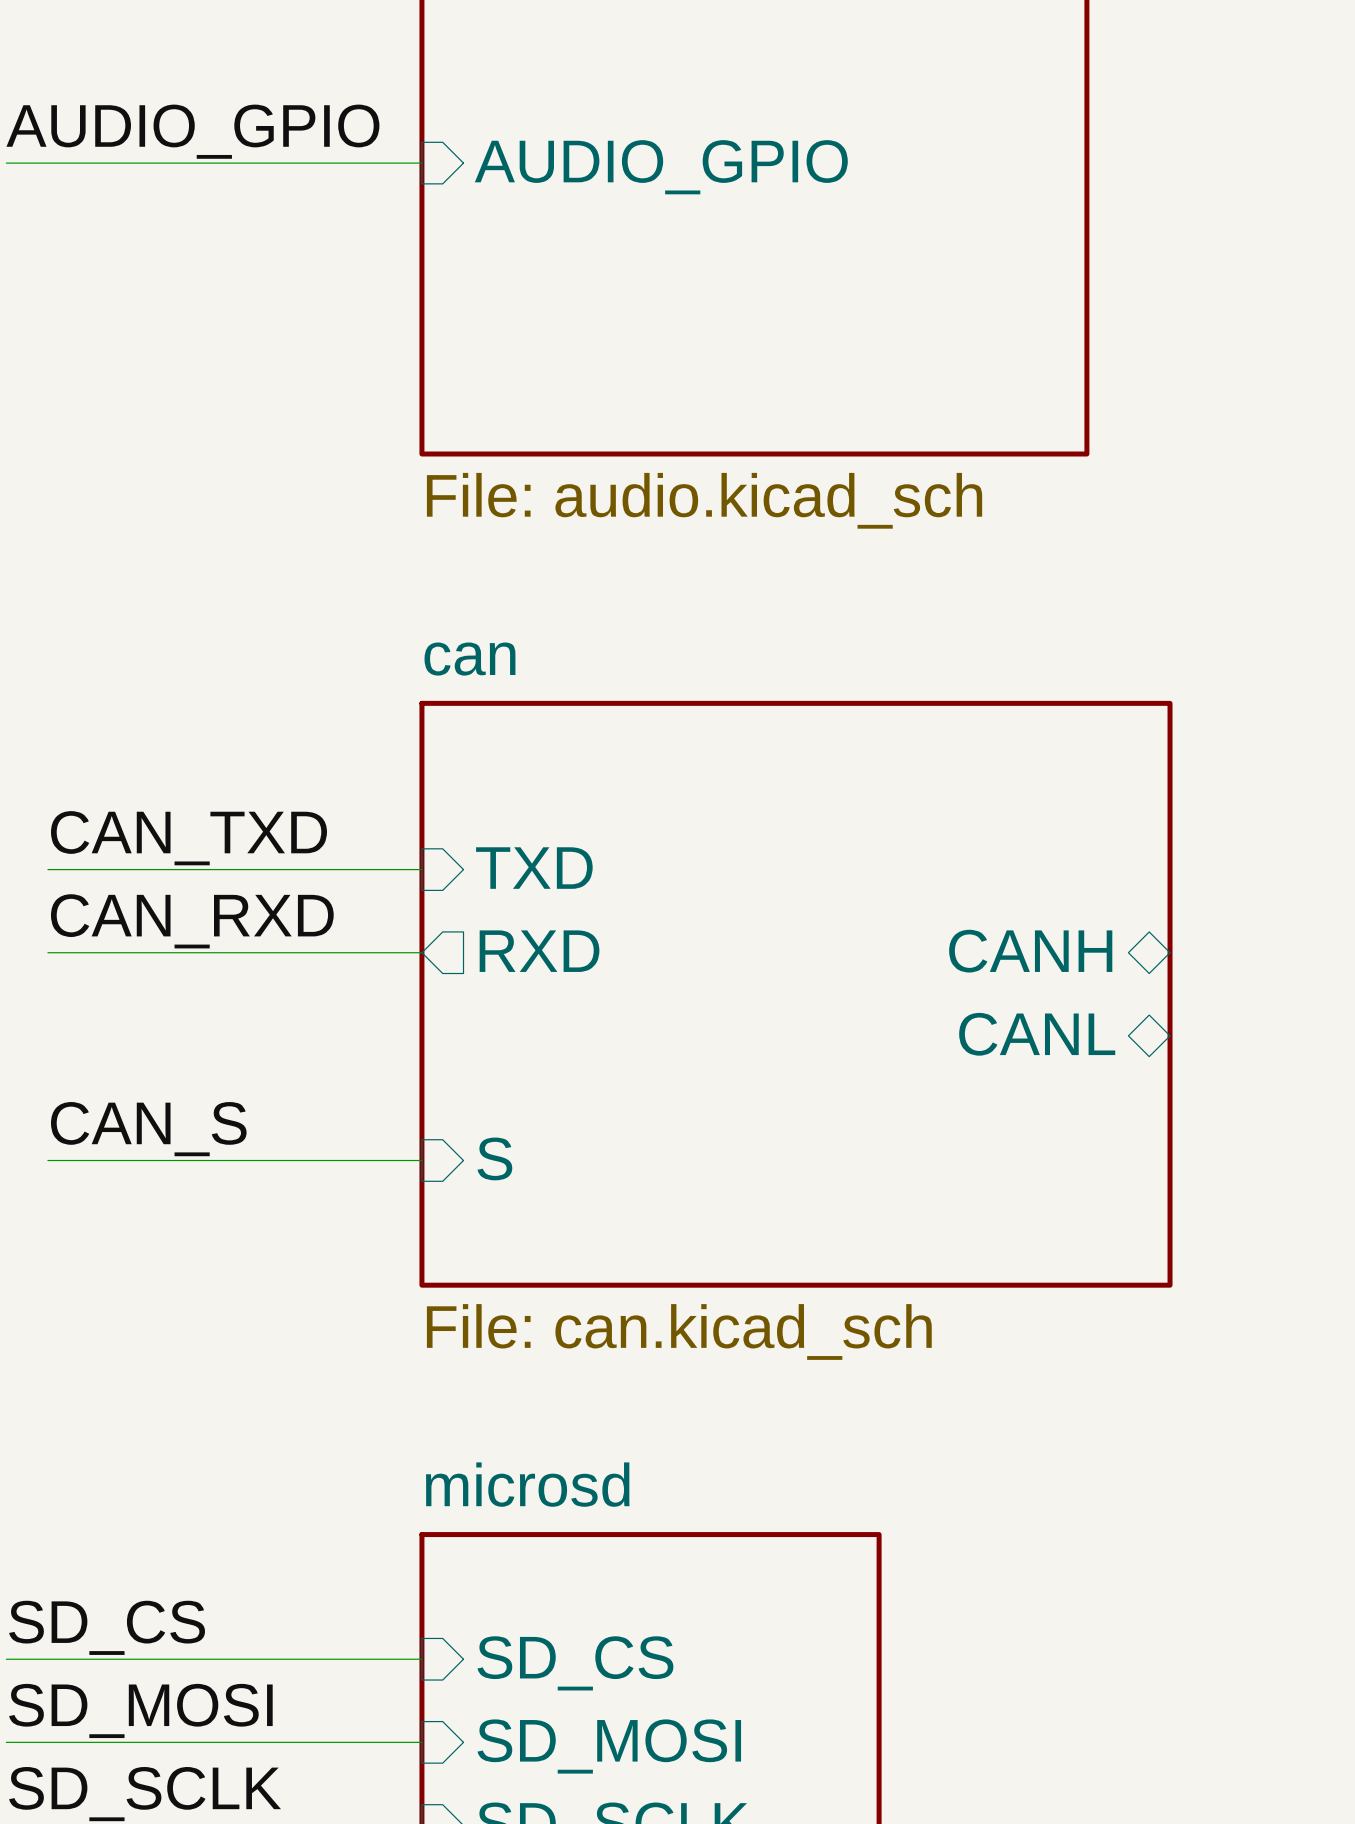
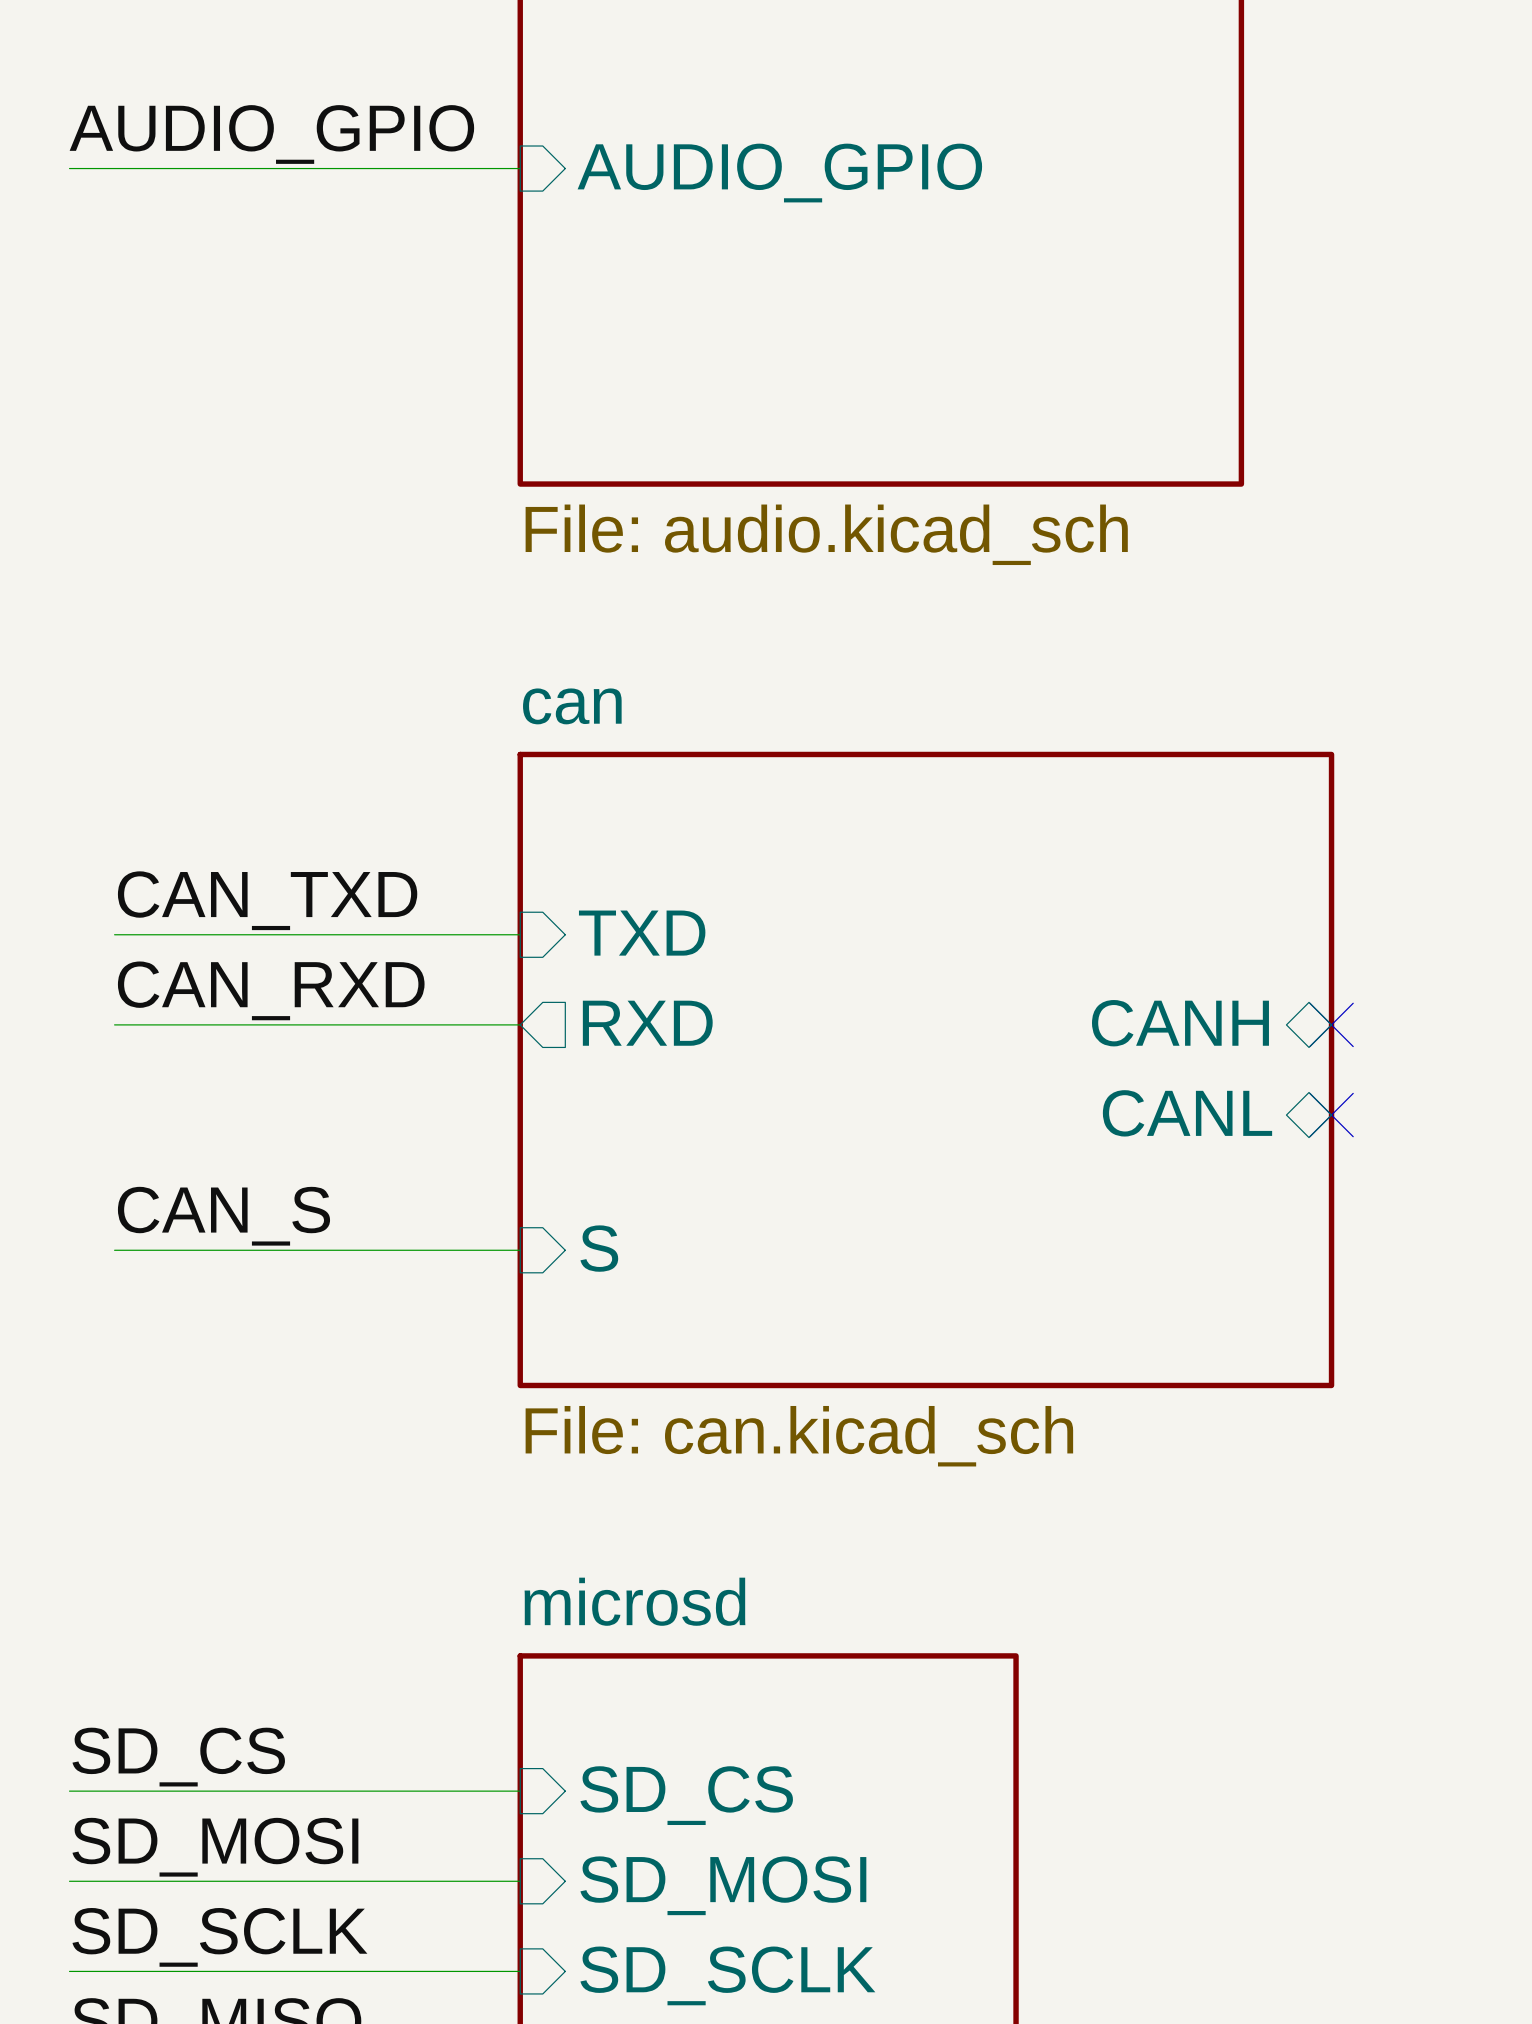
no-connect mark: none -> (1331, 1024)
no-connect mark: none -> (1331, 1115)

